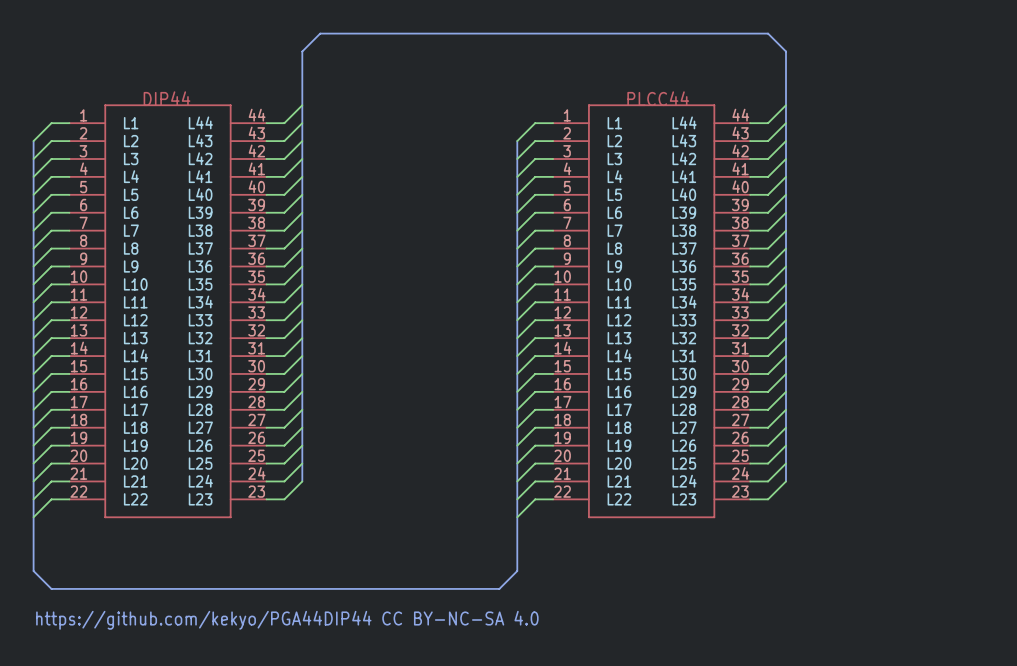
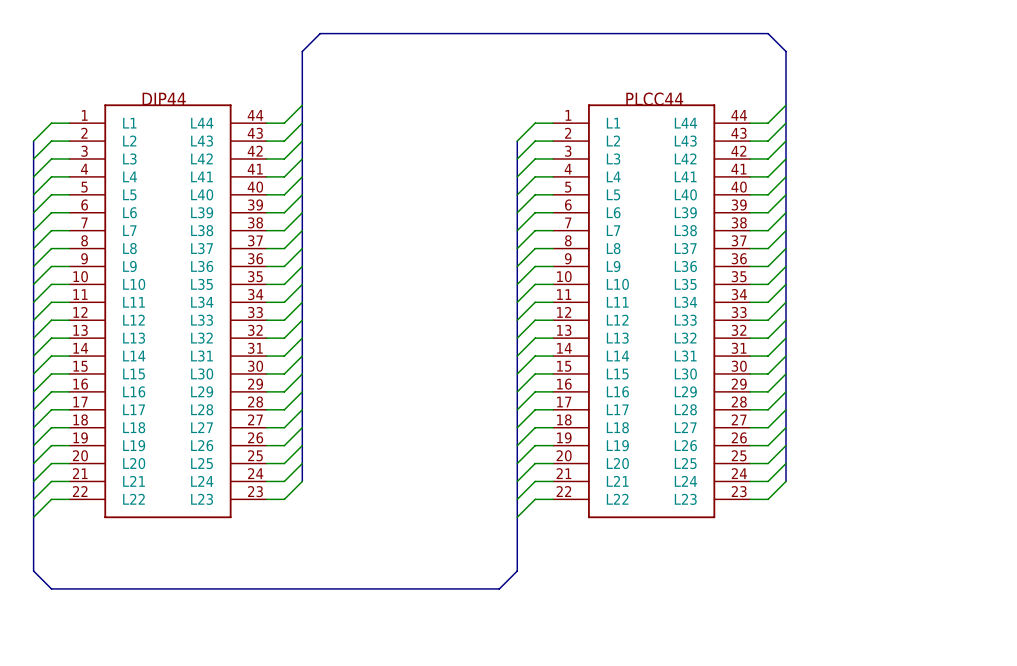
text: https://github.com/kekyo/PGA44DIP44 CC BY-NC-SA 4.0 (287, 620) -> none

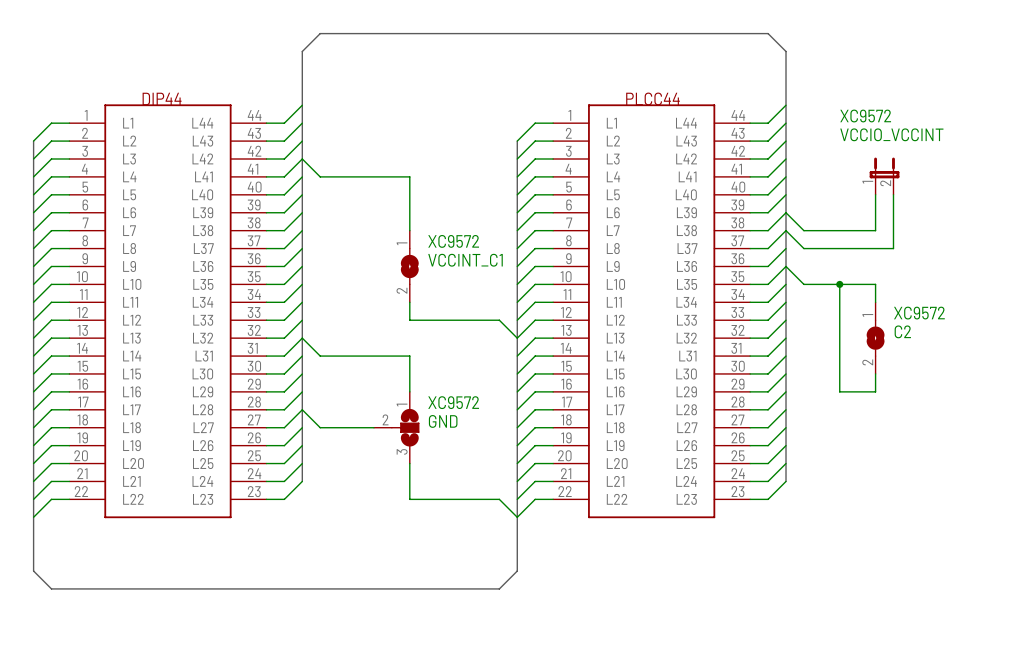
text: none -> XC9572 (865, 116)
text: none -> VCCIO_VCCINT (891, 134)
wire: none -> (302, 159) (320, 176) (409, 176) (409, 230)
part: none -> (884, 176)
wire: none -> (875, 194) (875, 230) (803, 230) (786, 212)
wire: none -> (893, 194) (893, 248) (803, 248) (786, 230)
text: none -> XC9572 (453, 241)
text: none -> VCCINT_C1 (465, 260)
part: none -> (409, 266)
wire: none -> (786, 266) (803, 284) (875, 284) (875, 302)
wire: none -> (839, 284) (839, 391) (875, 391) (875, 373)
junction: none -> (839, 284)
wire: none -> (409, 302) (409, 320) (499, 320) (517, 338)
text: none -> XC9572 (919, 313)
text: none -> C2 (902, 331)
wire: none -> (302, 338) (320, 356) (409, 356) (409, 391)
part: none -> (875, 338)
text: none -> XC9572 (453, 402)
wire: none -> (302, 409) (320, 427) (373, 427)
text: none -> GND (443, 421)
part: none -> (396, 427)
wire: none -> (409, 463) (409, 499) (499, 499) (517, 517)

